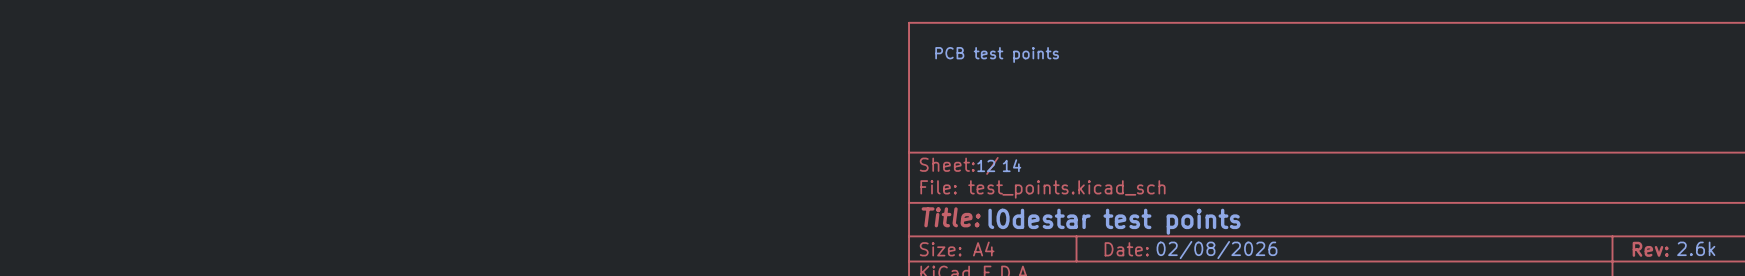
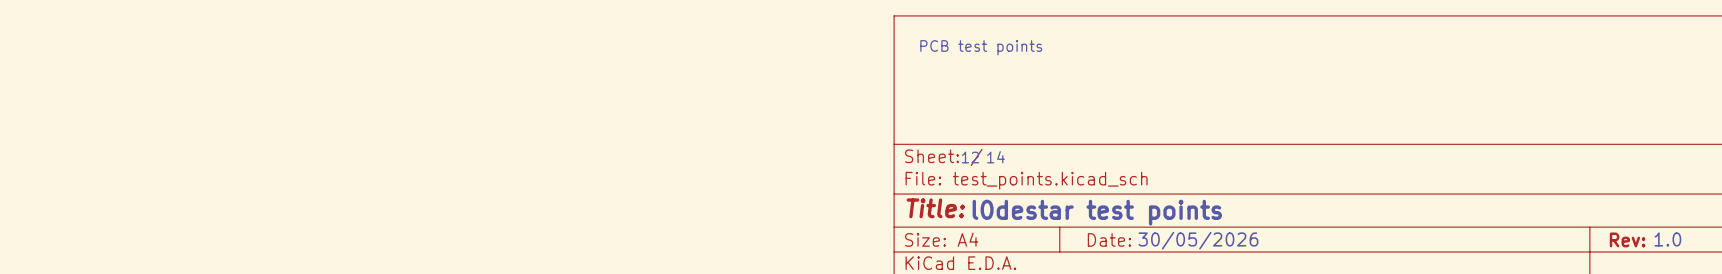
text: 2.6k (1696, 248) -> 1.0 (1667, 239)
text: 02/08/2026 (1217, 250) -> 30/05/2026 (1198, 240)

